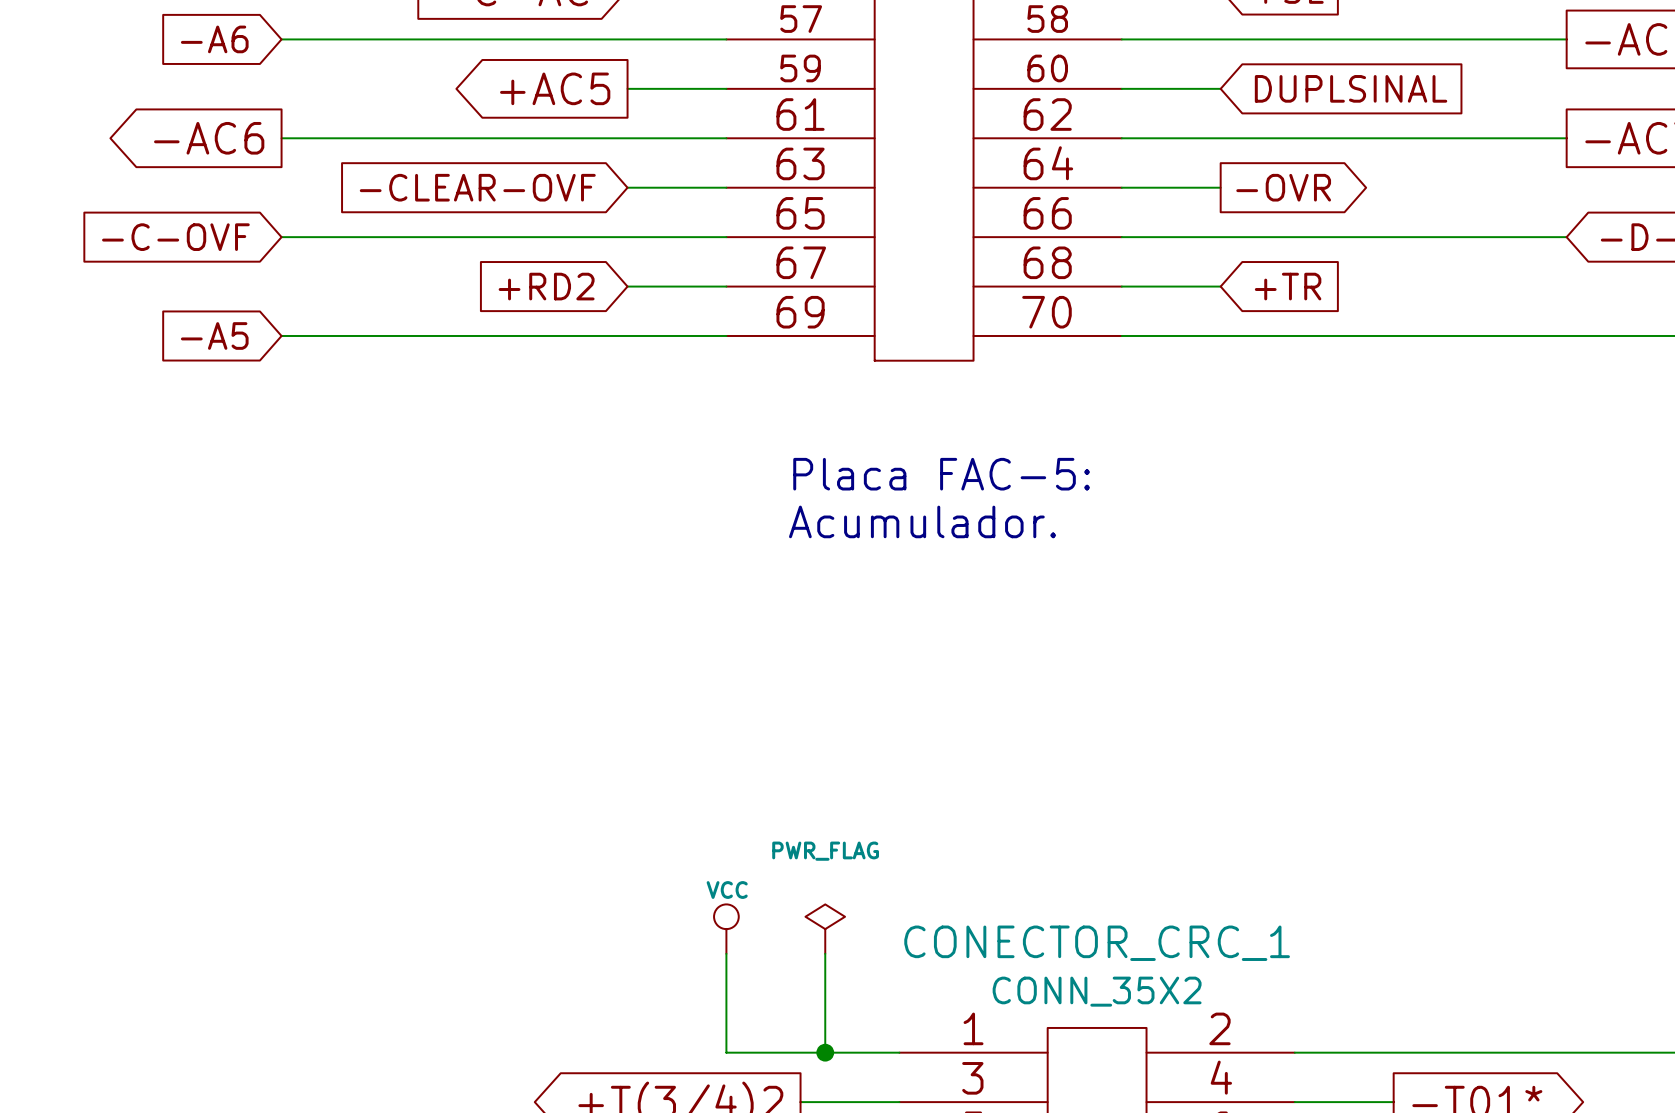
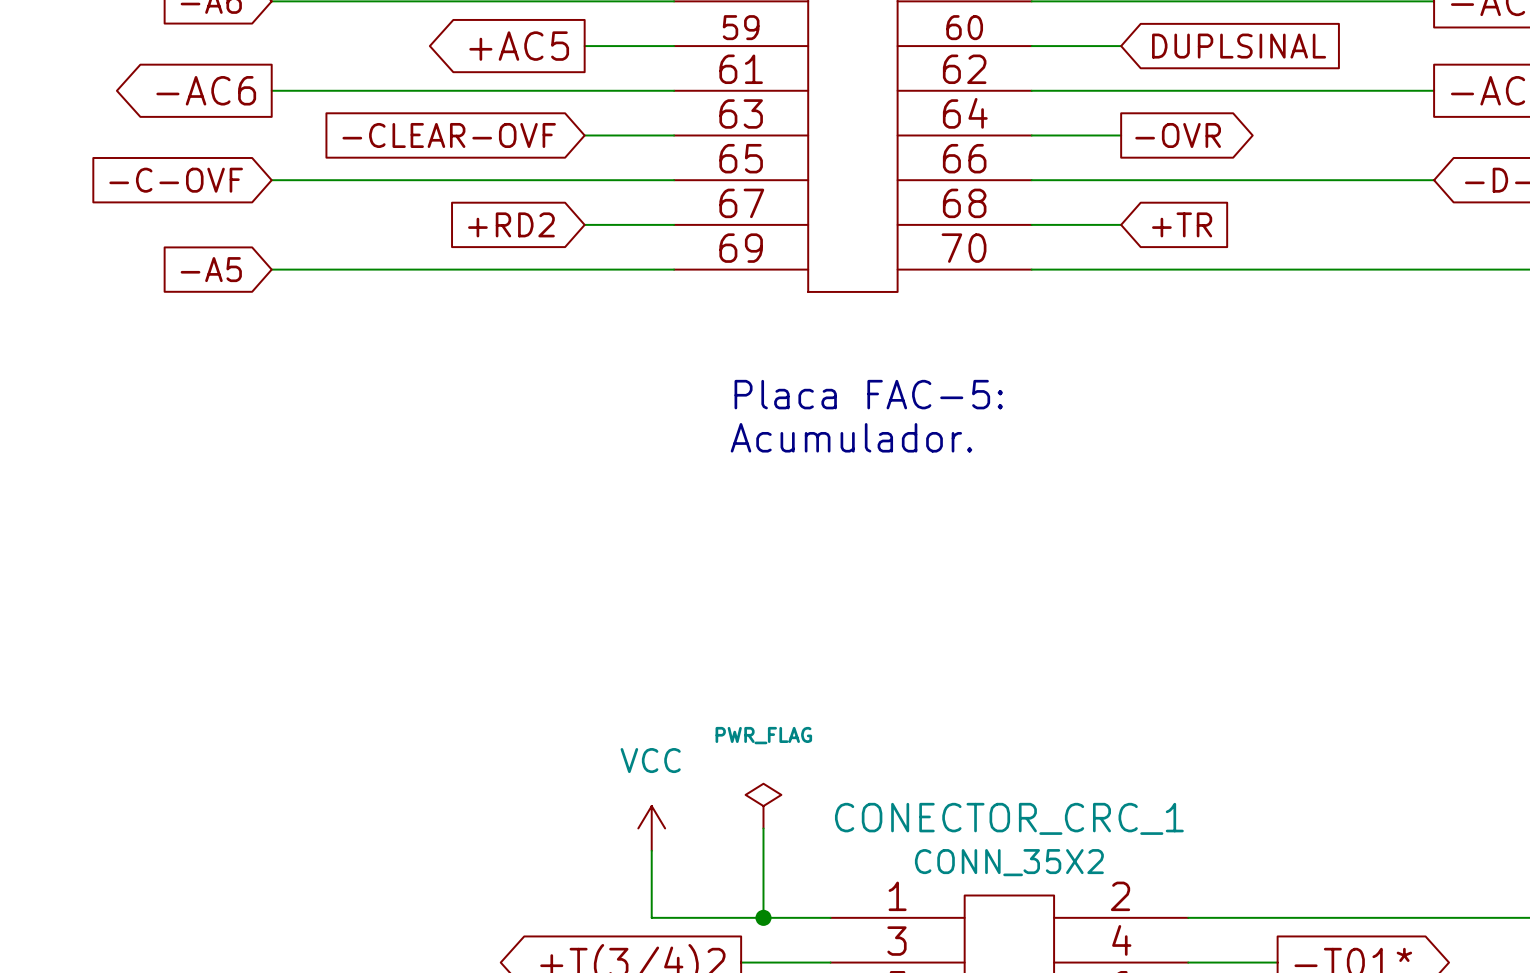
power symbol: VCC (726, 929) -> none
power symbol: none -> VCC (651, 828)
wire: (726, 953) (726, 1052) -> (651, 850) (651, 917) (674, 917)

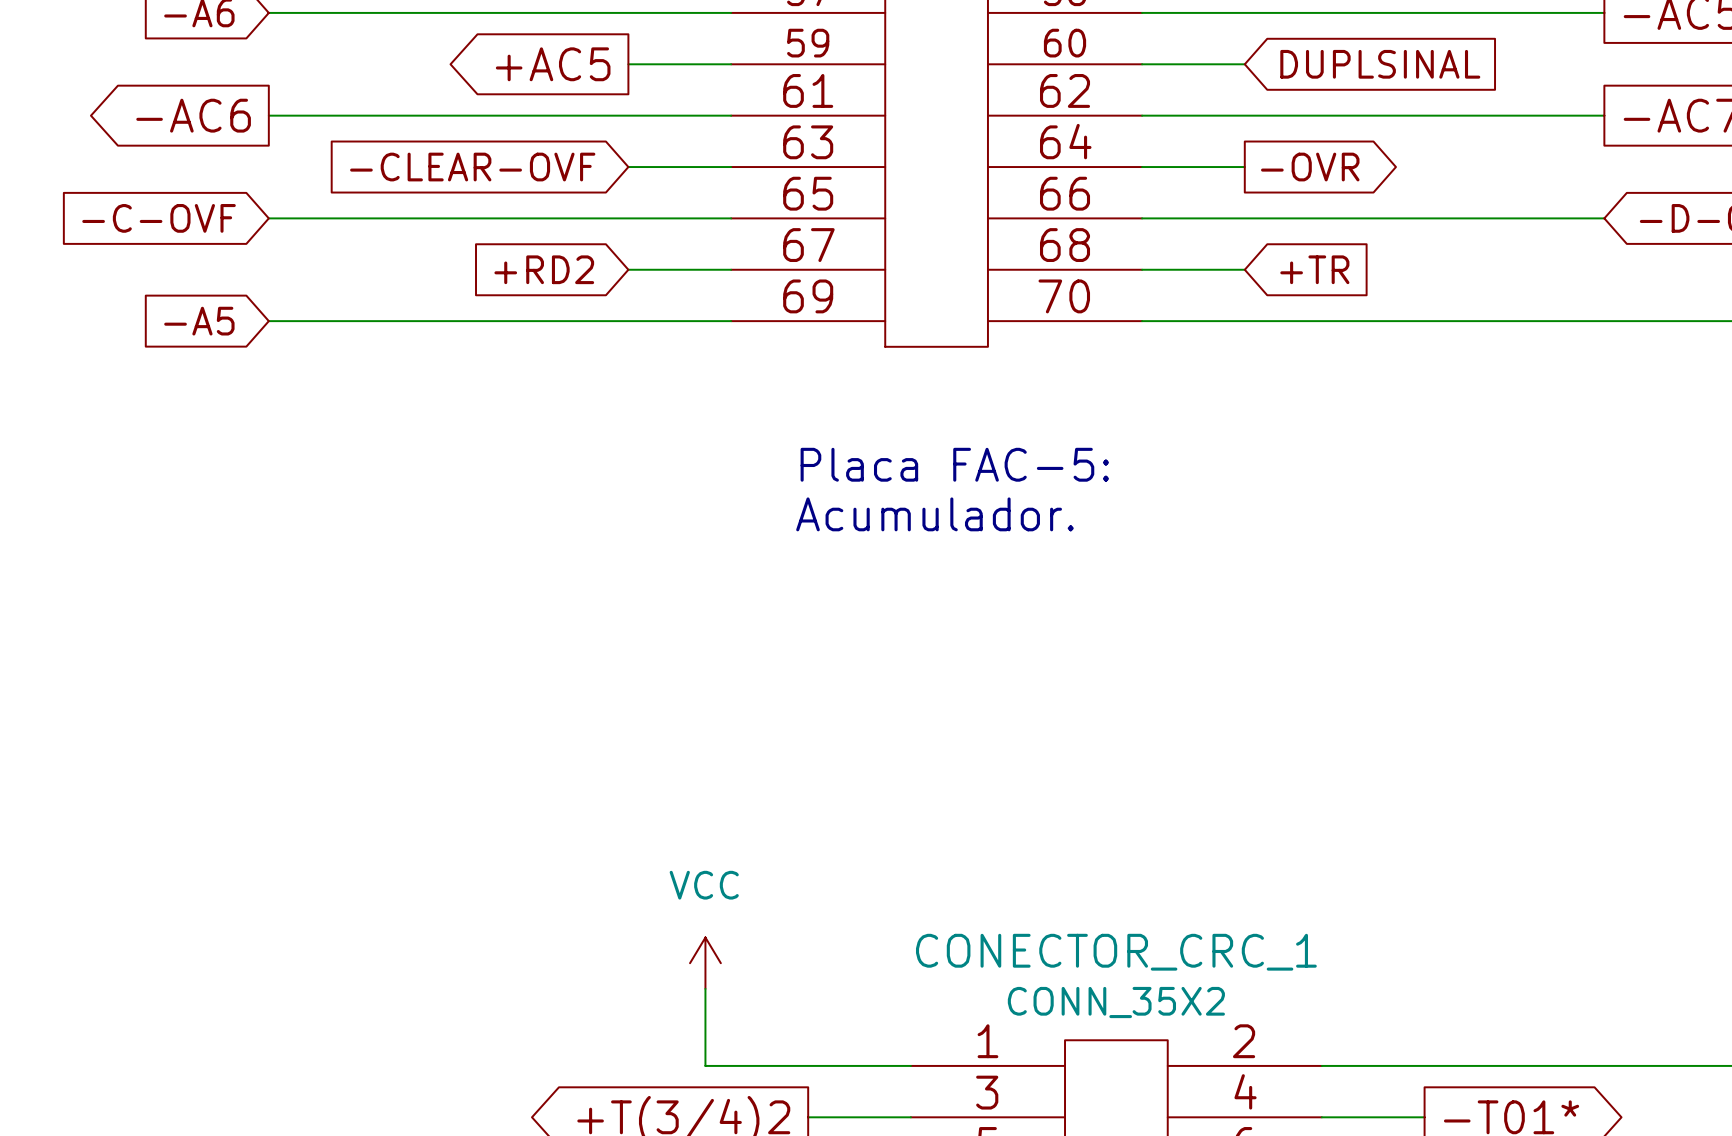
power symbol: PWR_FLAG (763, 806) -> none
wire: (763, 828) (763, 917) -> none
junction: (763, 917) -> none

